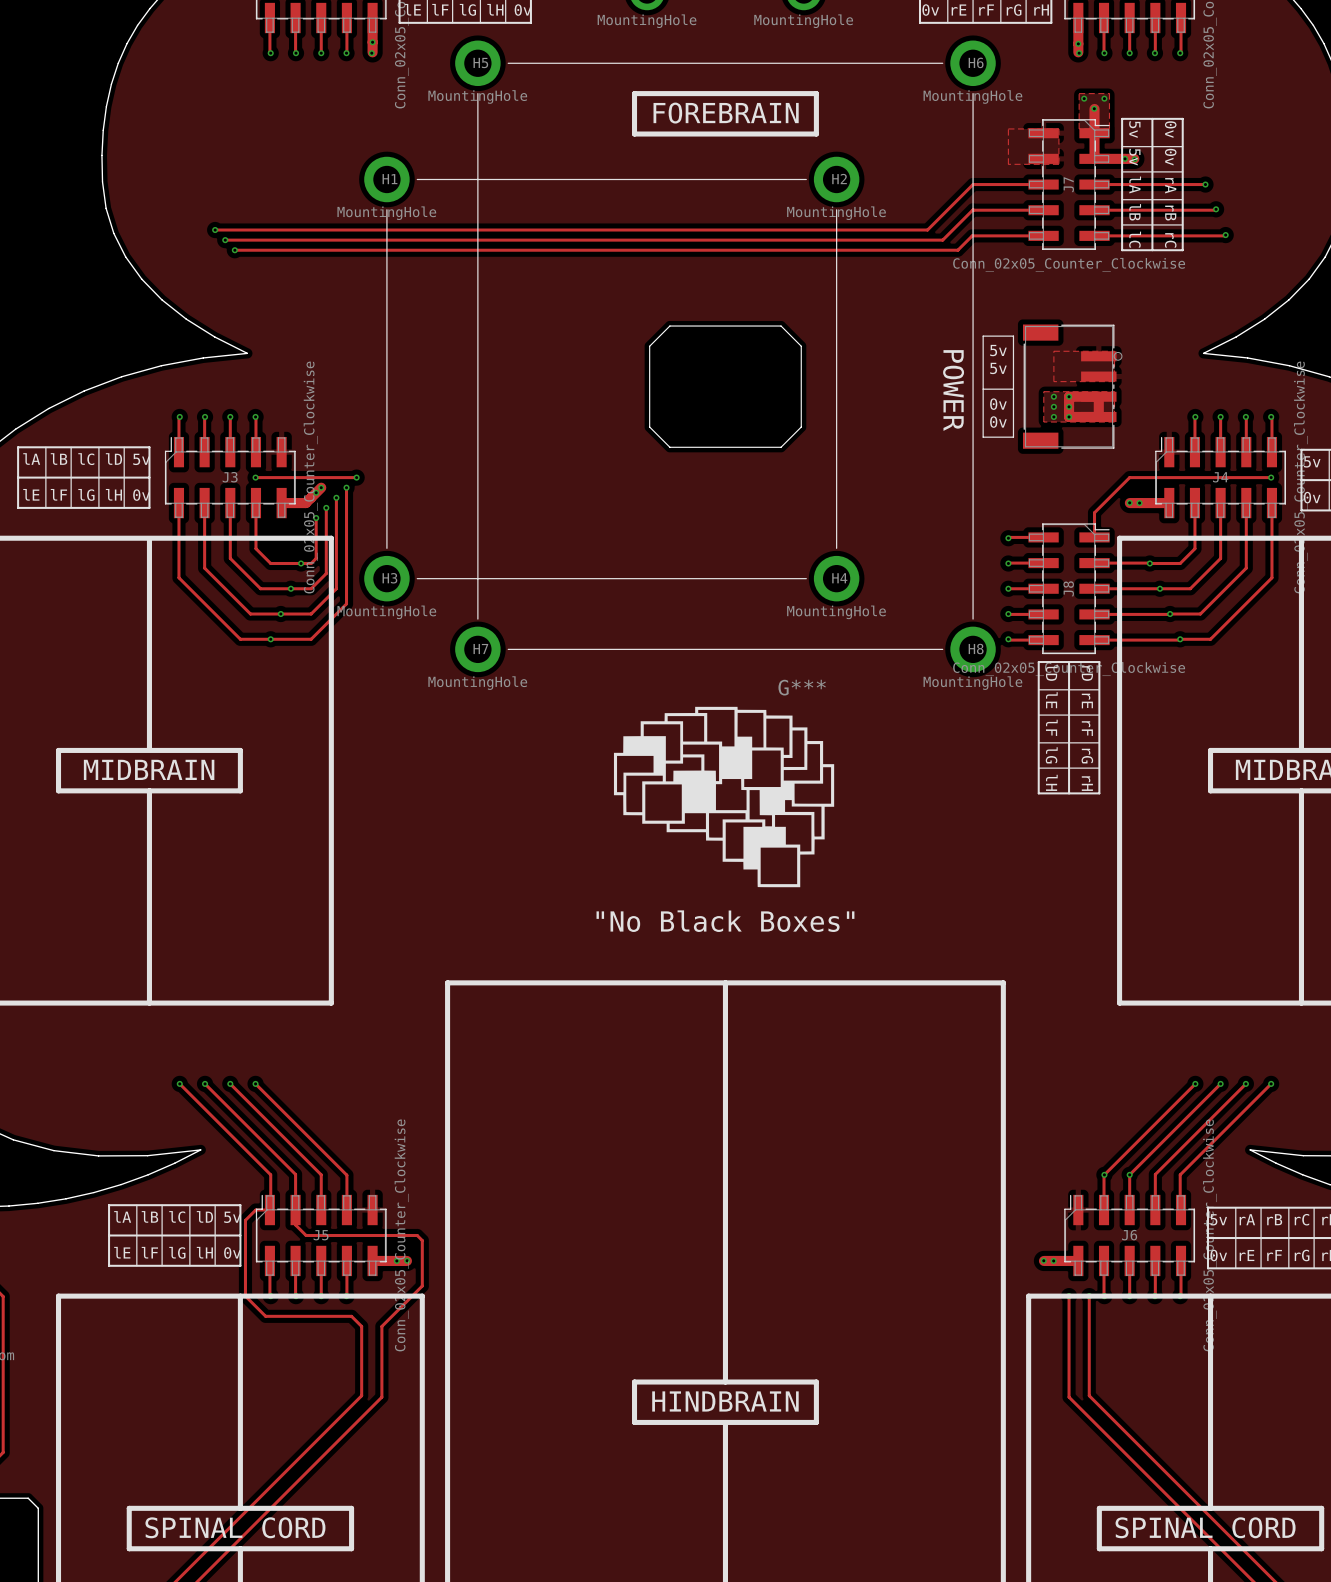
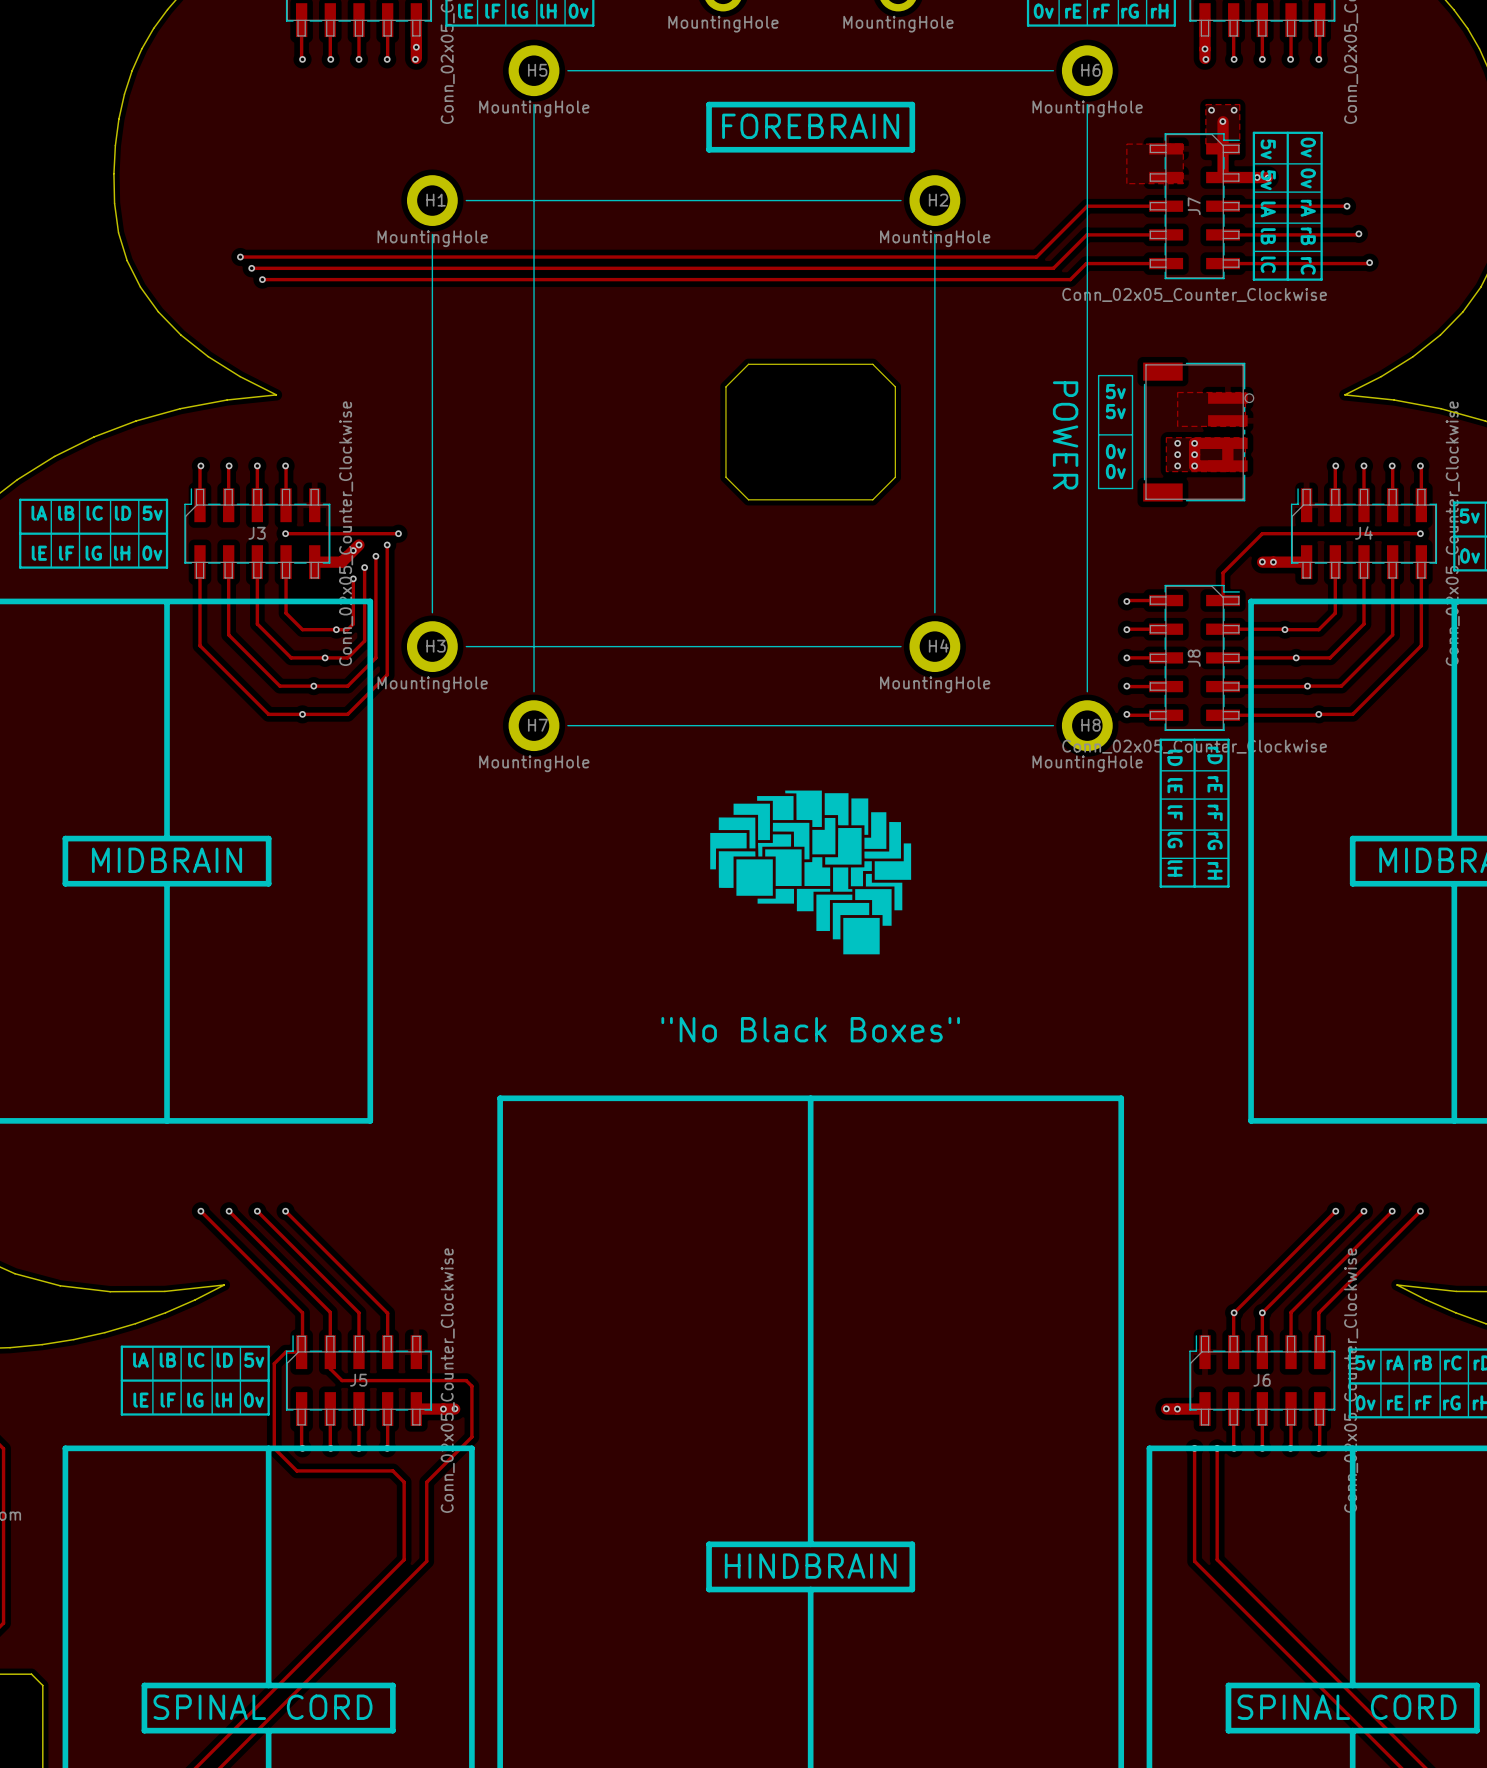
drawing: none -> [710, 790, 912, 955]
G***: (724, 797) -> none

